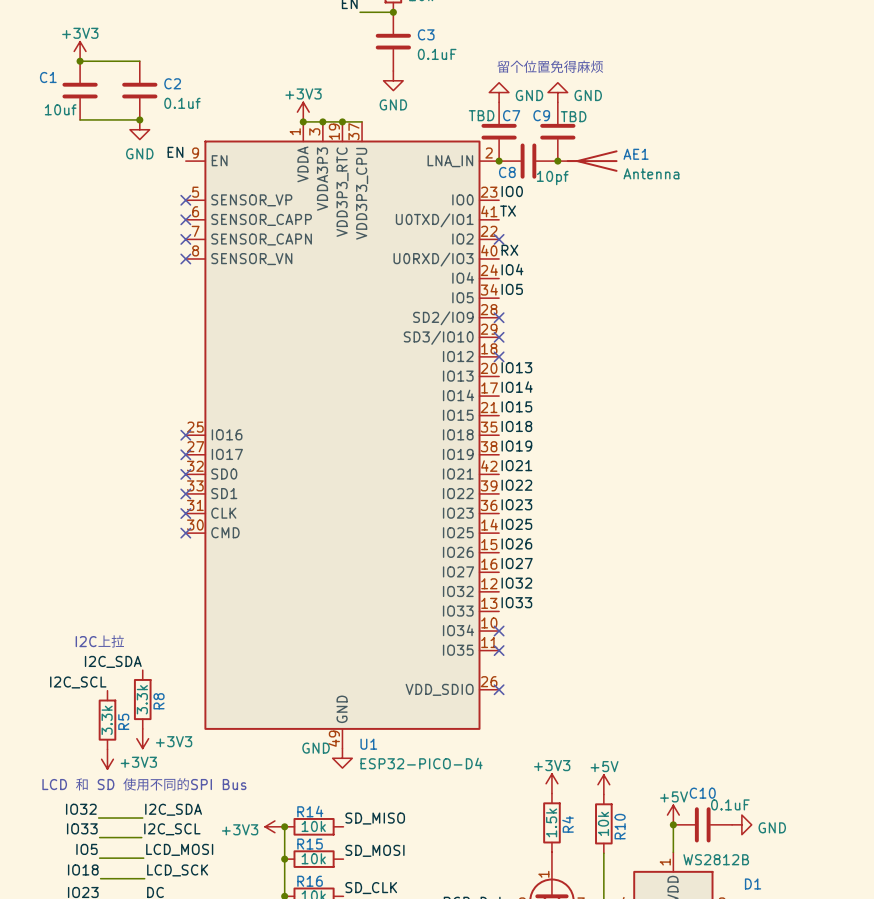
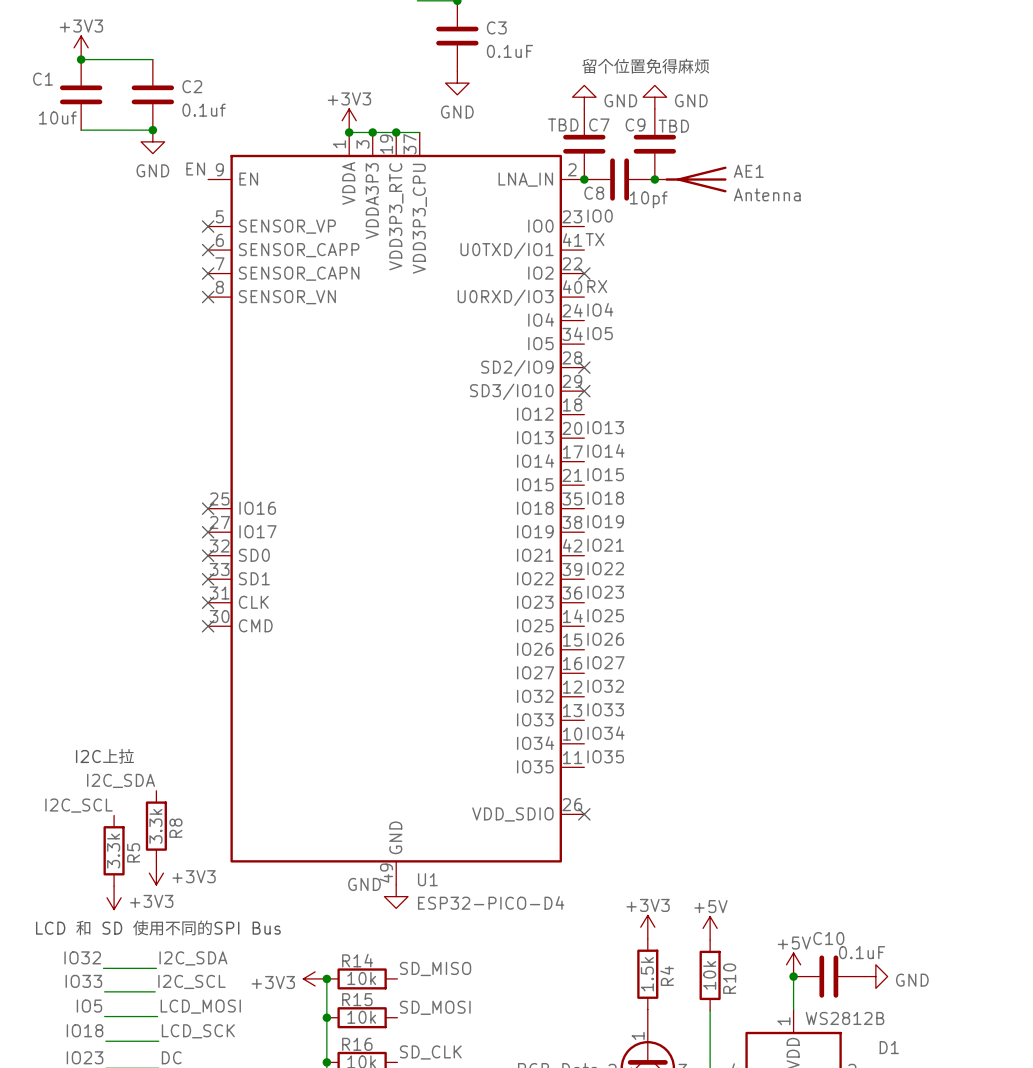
no-connect mark: (499, 356) -> none
label: none -> IO34 (605, 733)
no-connect mark: (499, 631) -> none
label: none -> IO35 (605, 756)
no-connect mark: (499, 650) -> none

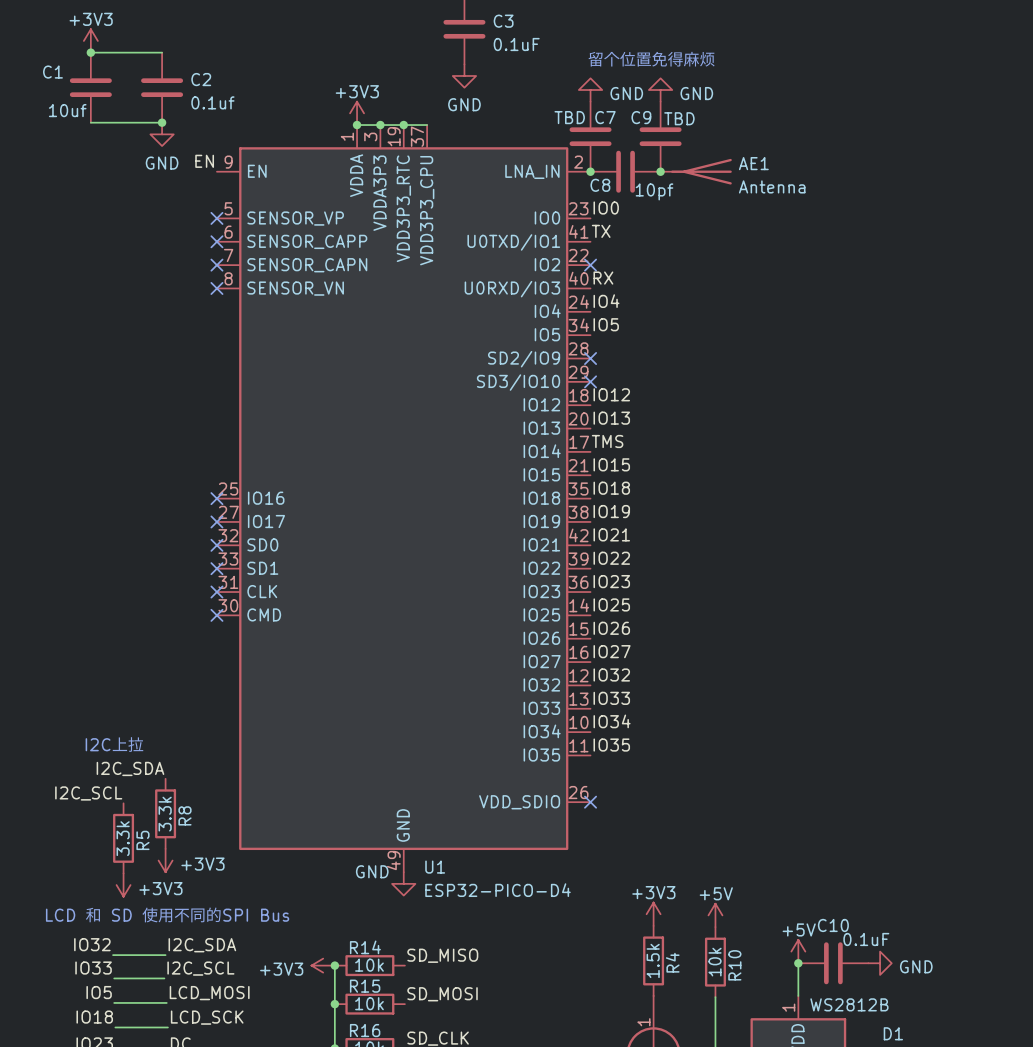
label: none -> IO12 (611, 394)
label: IO14 (605, 450) -> TMS (607, 441)

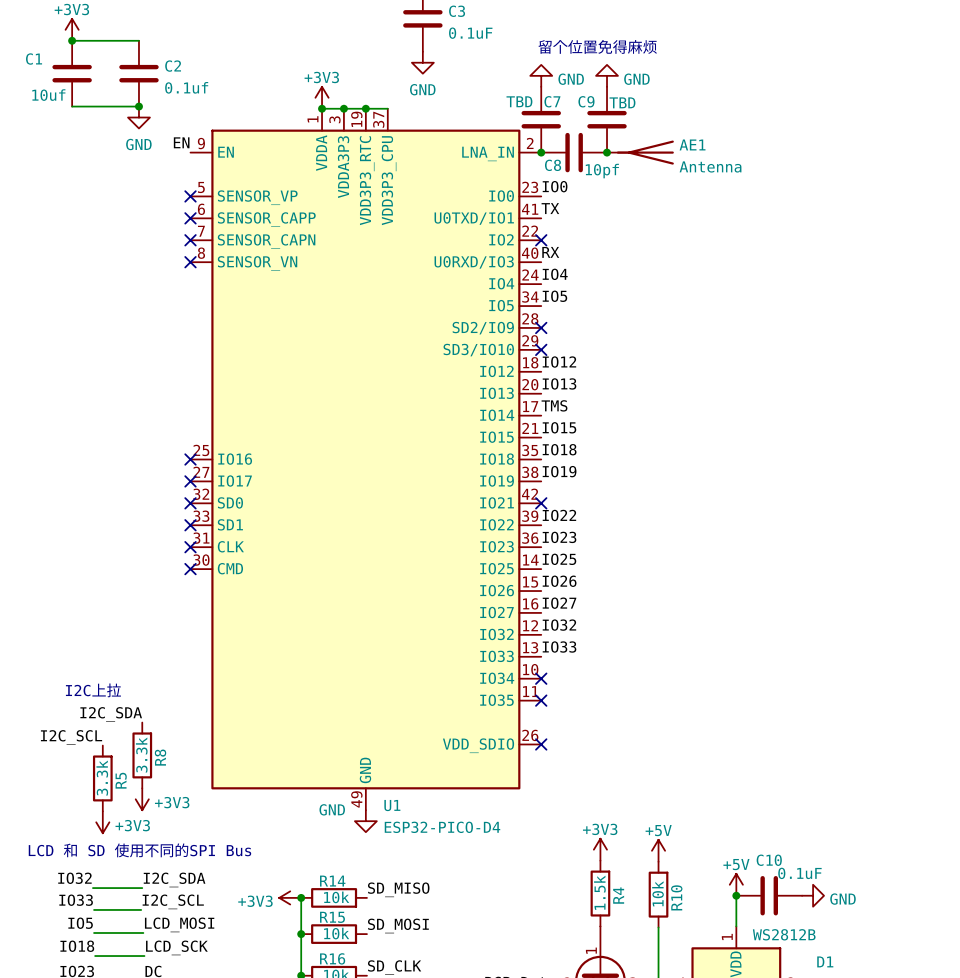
label: IO21 (611, 534) -> none
no-connect mark: none -> (541, 503)
label: IO34 (612, 721) -> none
no-connect mark: none -> (541, 678)
label: IO35 (611, 745) -> none
no-connect mark: none -> (541, 700)

